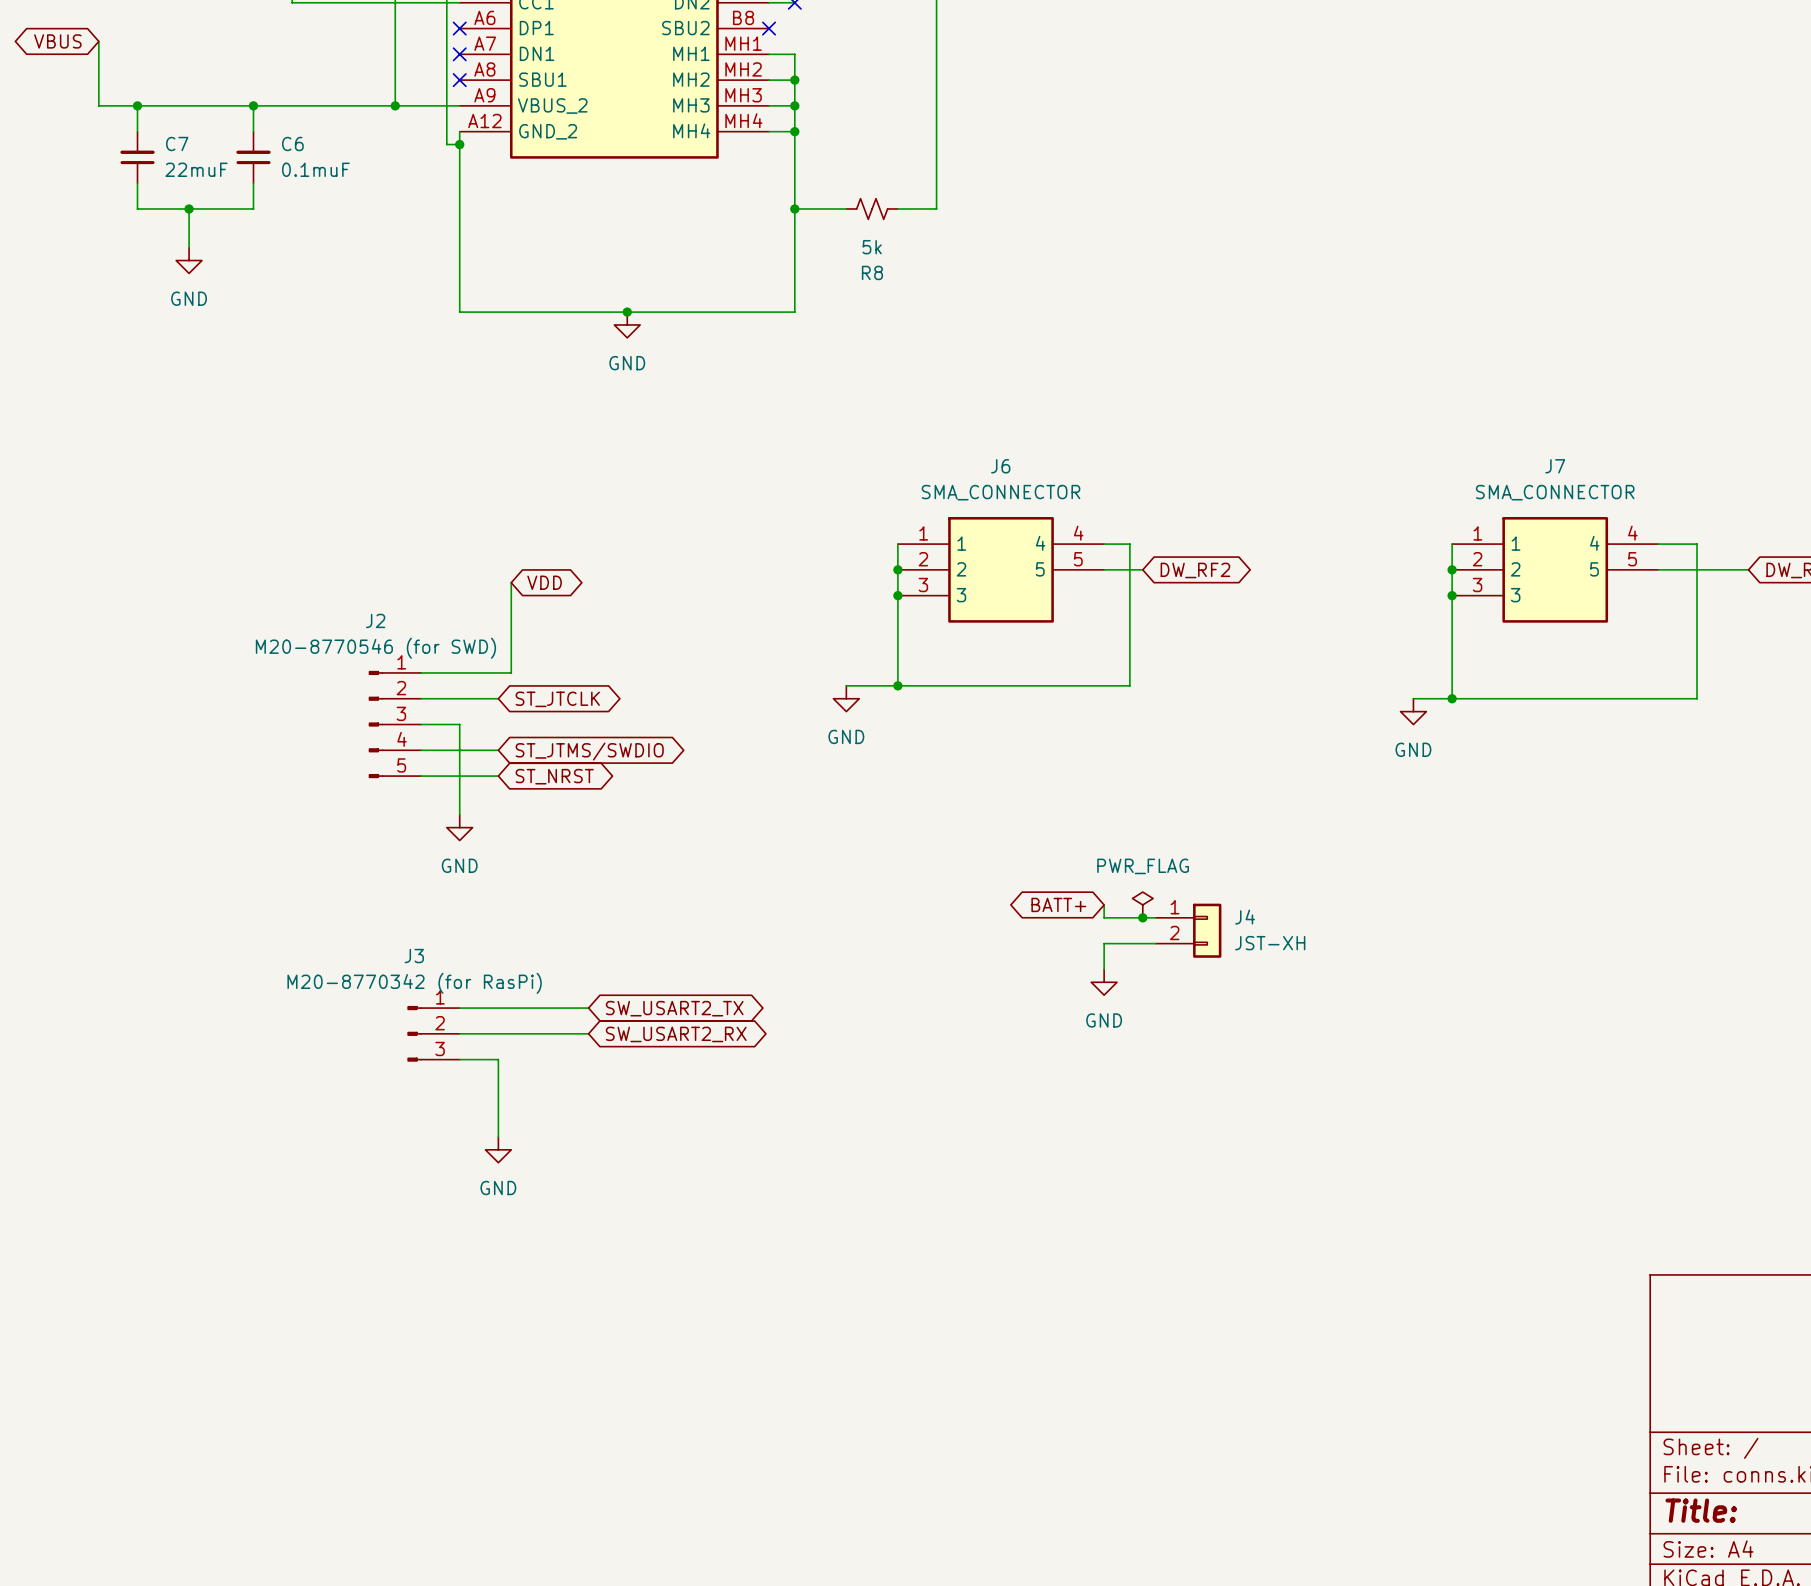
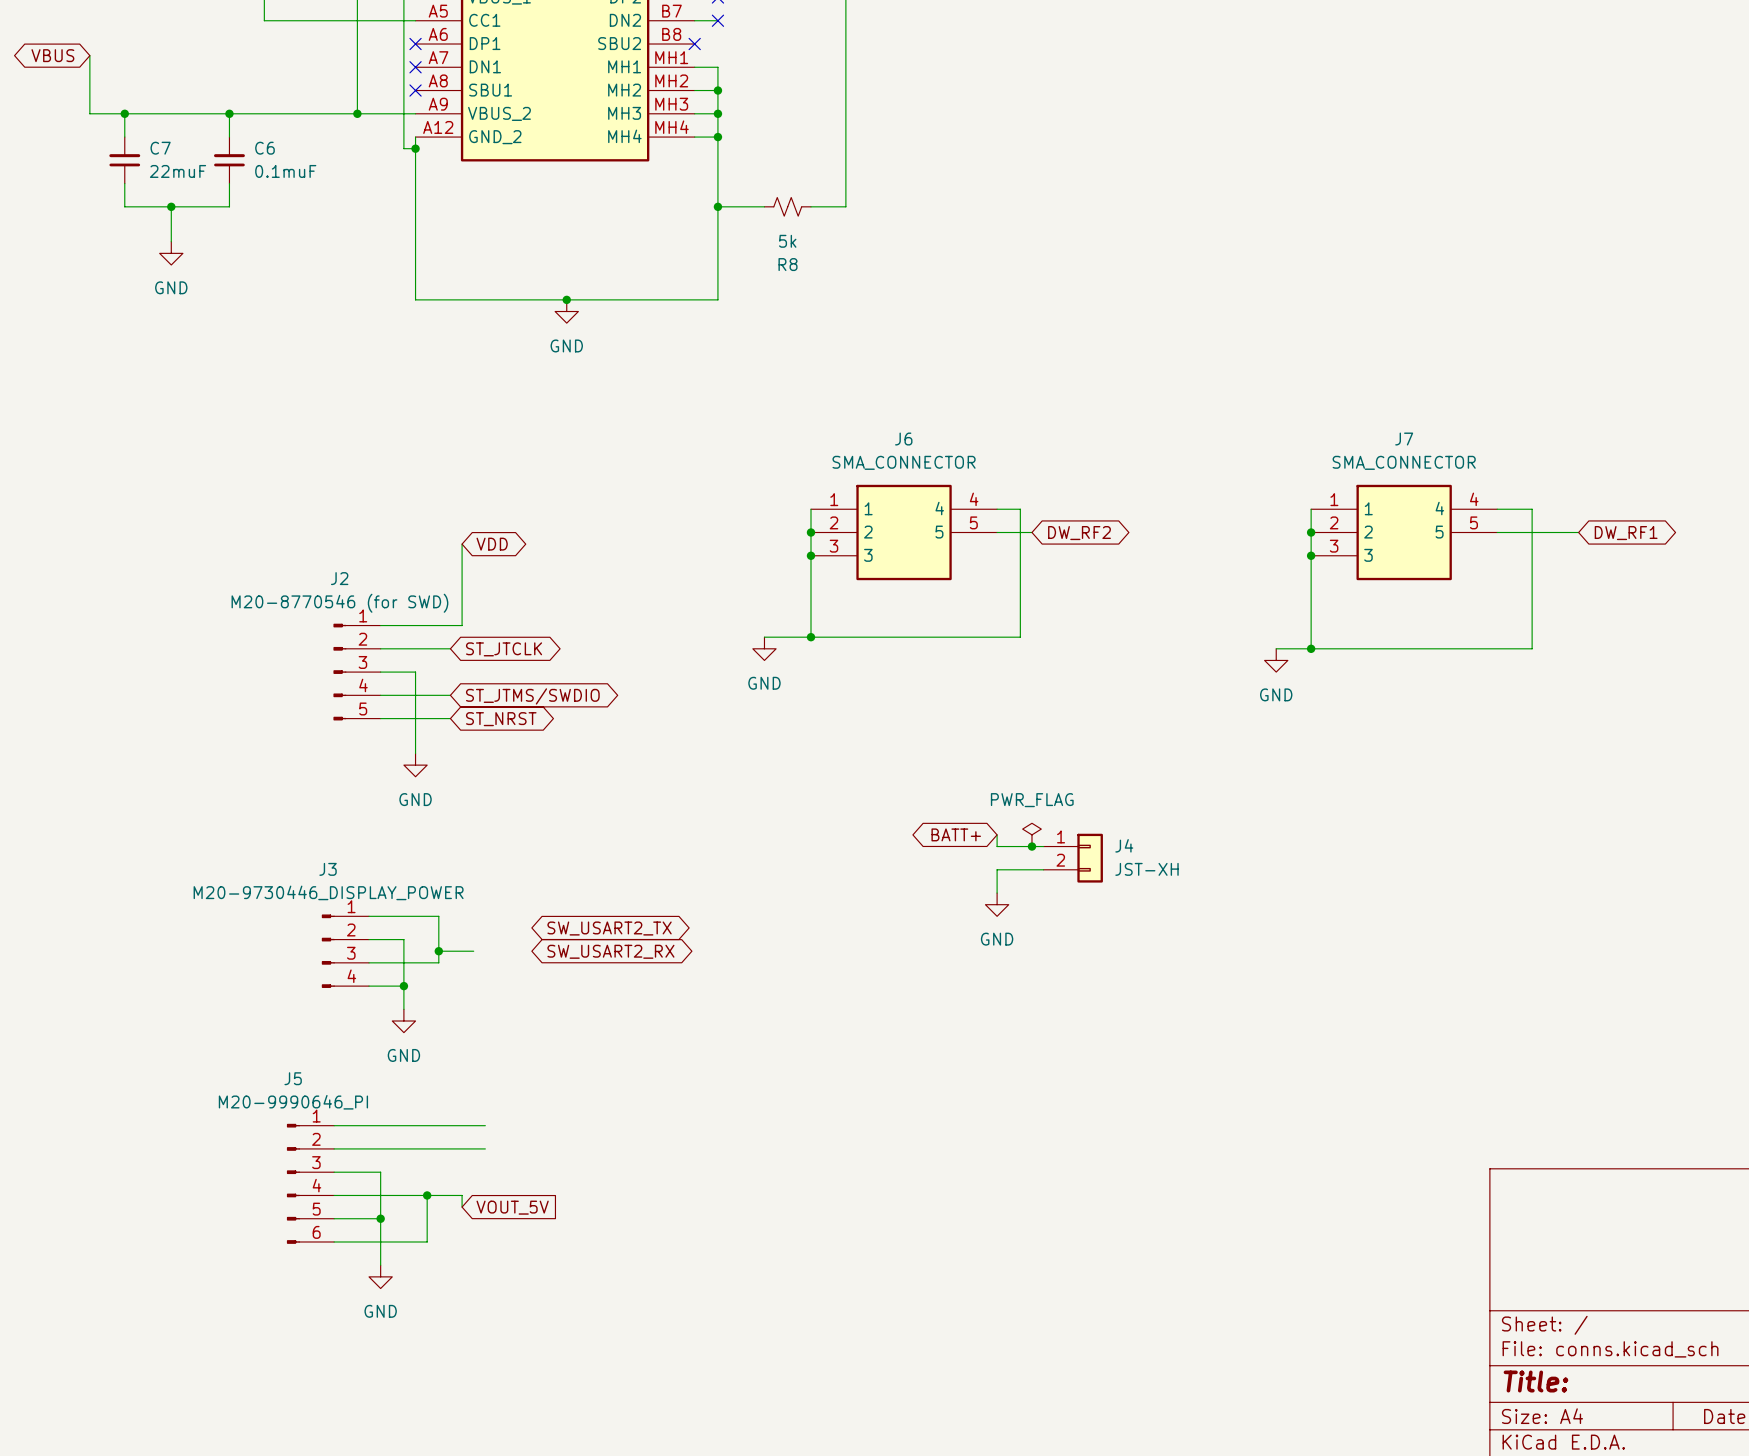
J3 value: M20-8770342 (for RasPi) (414, 983) -> M20-9730446_DISPLAY_POWER (328, 892)
wire: none -> (369, 916) (438, 916) (438, 962) (369, 962)
J3 symbol: [407, 1006, 460, 1062] -> [321, 914, 370, 988]
wire: (459, 1008) (588, 1008) -> none
wire: (459, 1033) (485, 1033) -> none
junction: none -> (438, 951)
wire: (524, 1033) (588, 1033) -> none
wire: (459, 1059) (498, 1059) (498, 1136) -> (369, 939) (403, 939) (403, 1009)
wire: none -> (369, 986) (403, 986)
junction: none -> (403, 986)
power symbol position: GND (498, 1149) -> GND (403, 1021)
wire: none -> (334, 1125) (485, 1125)
wire: none -> (334, 1148) (485, 1148)
wire: none -> (334, 1172) (380, 1172) (380, 1265)
J5: none -> M20-9990646_PI (310, 1183)
wire: none -> (334, 1195) (462, 1195) (462, 1207)
wire: none -> (427, 1195) (427, 1241) (334, 1241)
junction: none -> (427, 1195)
global label: none -> VOUT_5V (512, 1207)
wire: none -> (334, 1218) (380, 1218)
junction: none -> (380, 1218)
power symbol: none -> GND (380, 1276)

